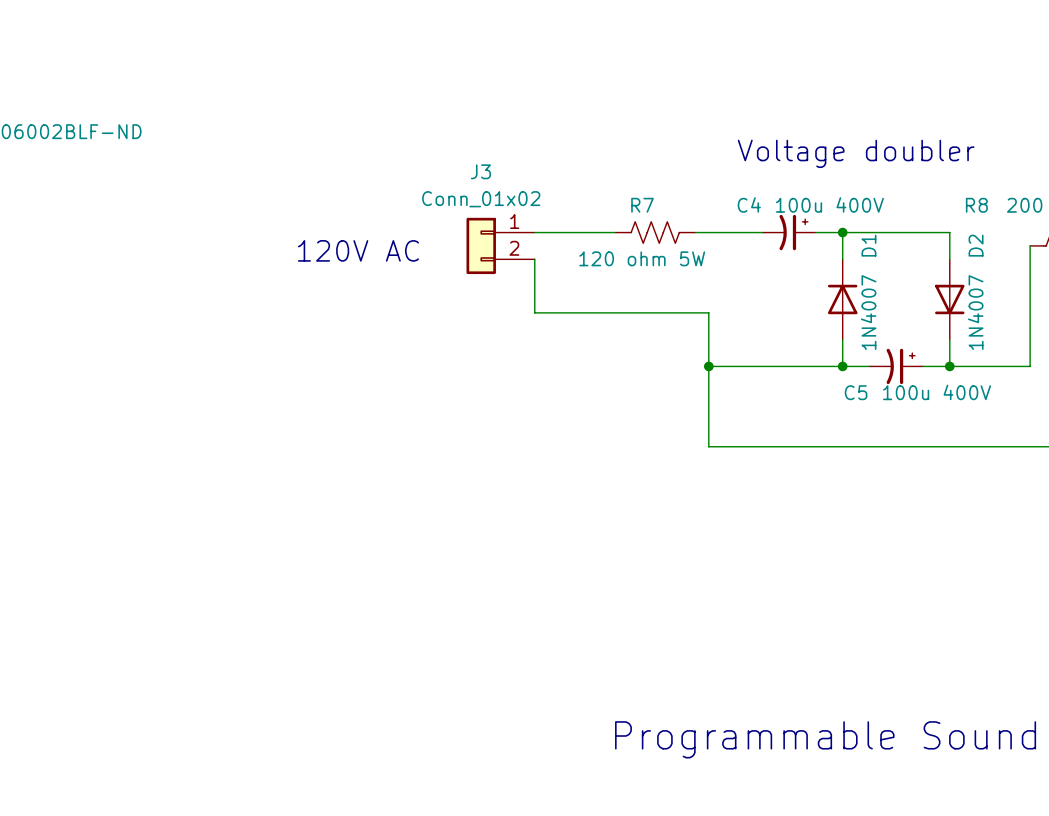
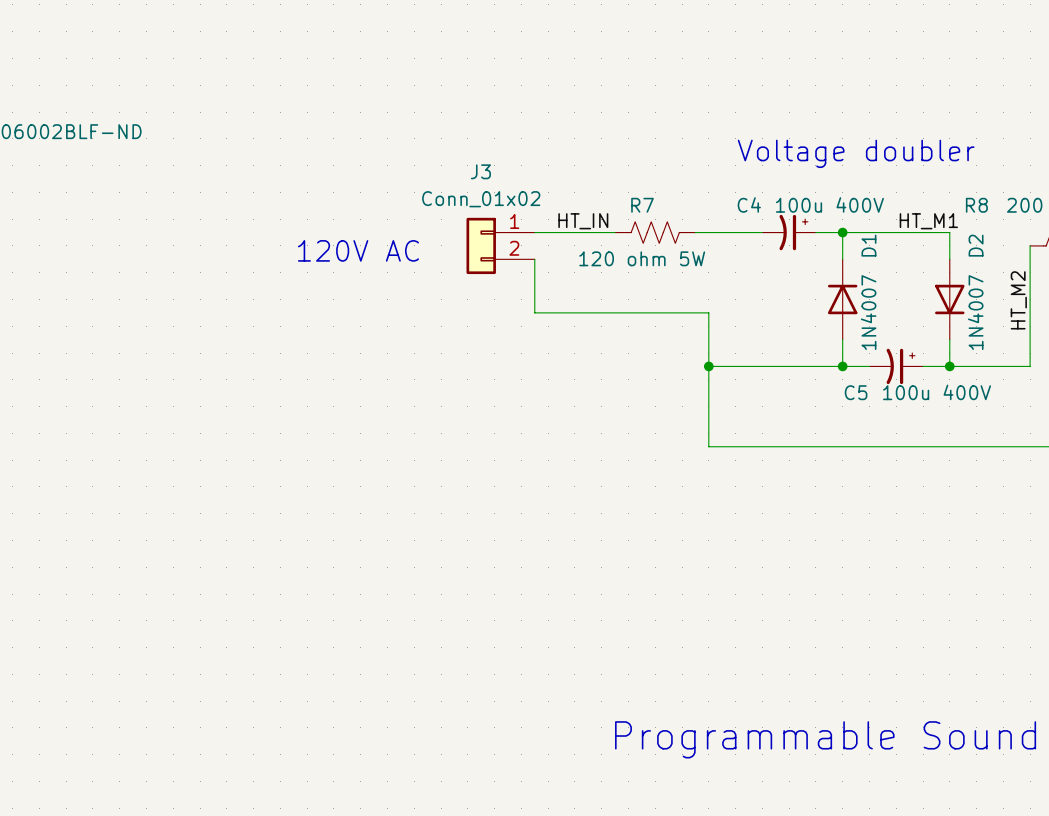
label: none -> HT_IN (583, 221)
label: none -> HT_M1 (928, 221)
label: none -> HT_M2 (1018, 300)

